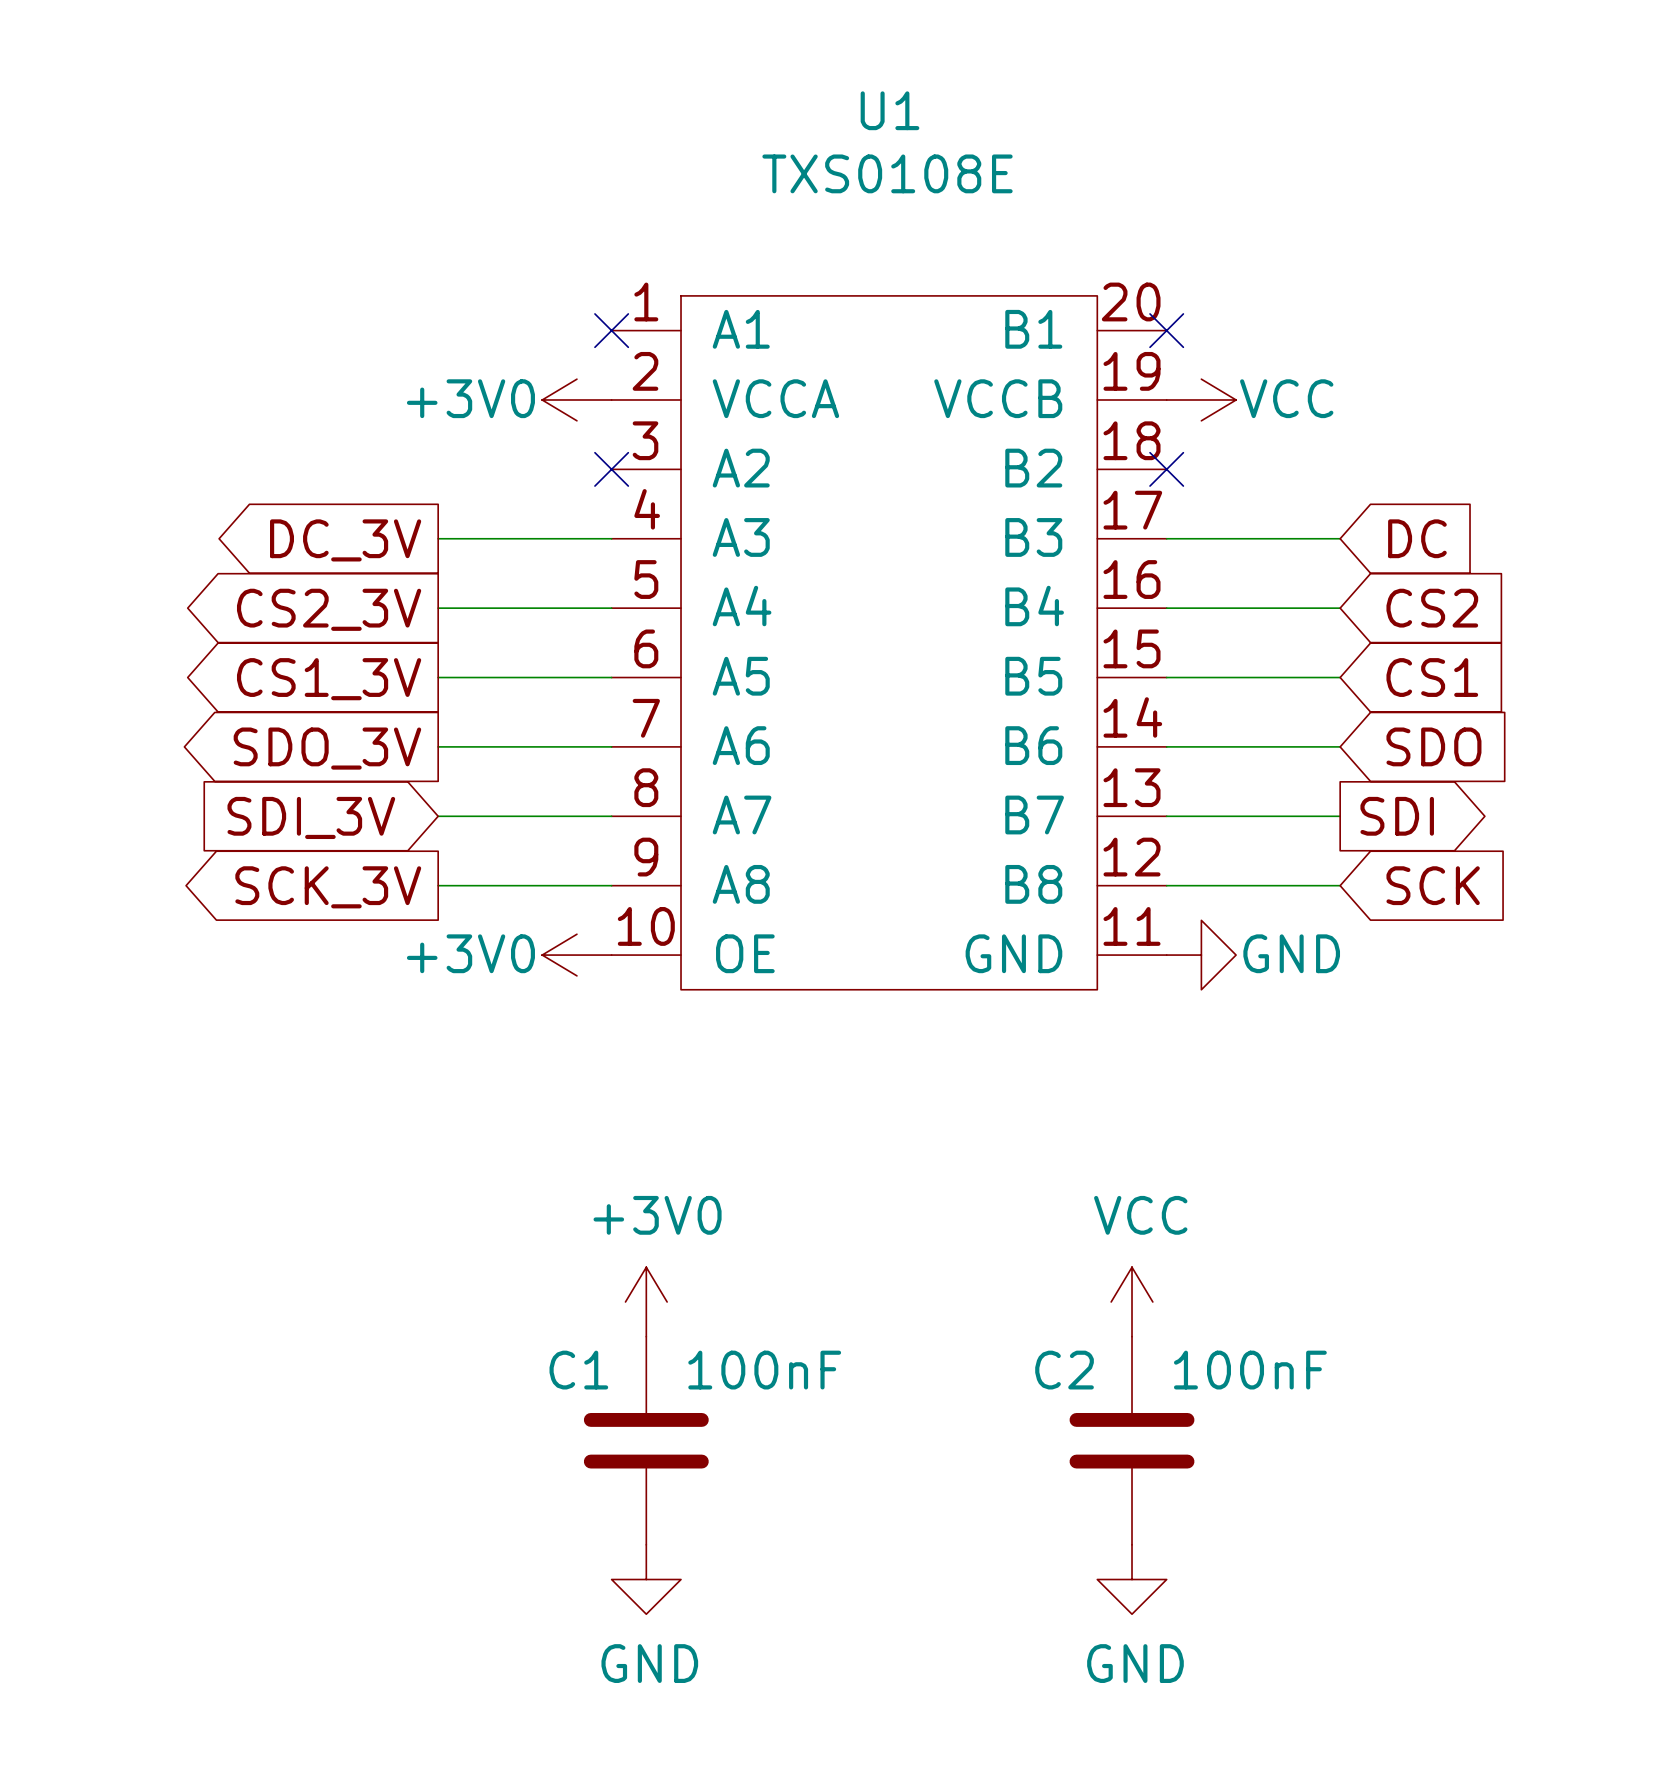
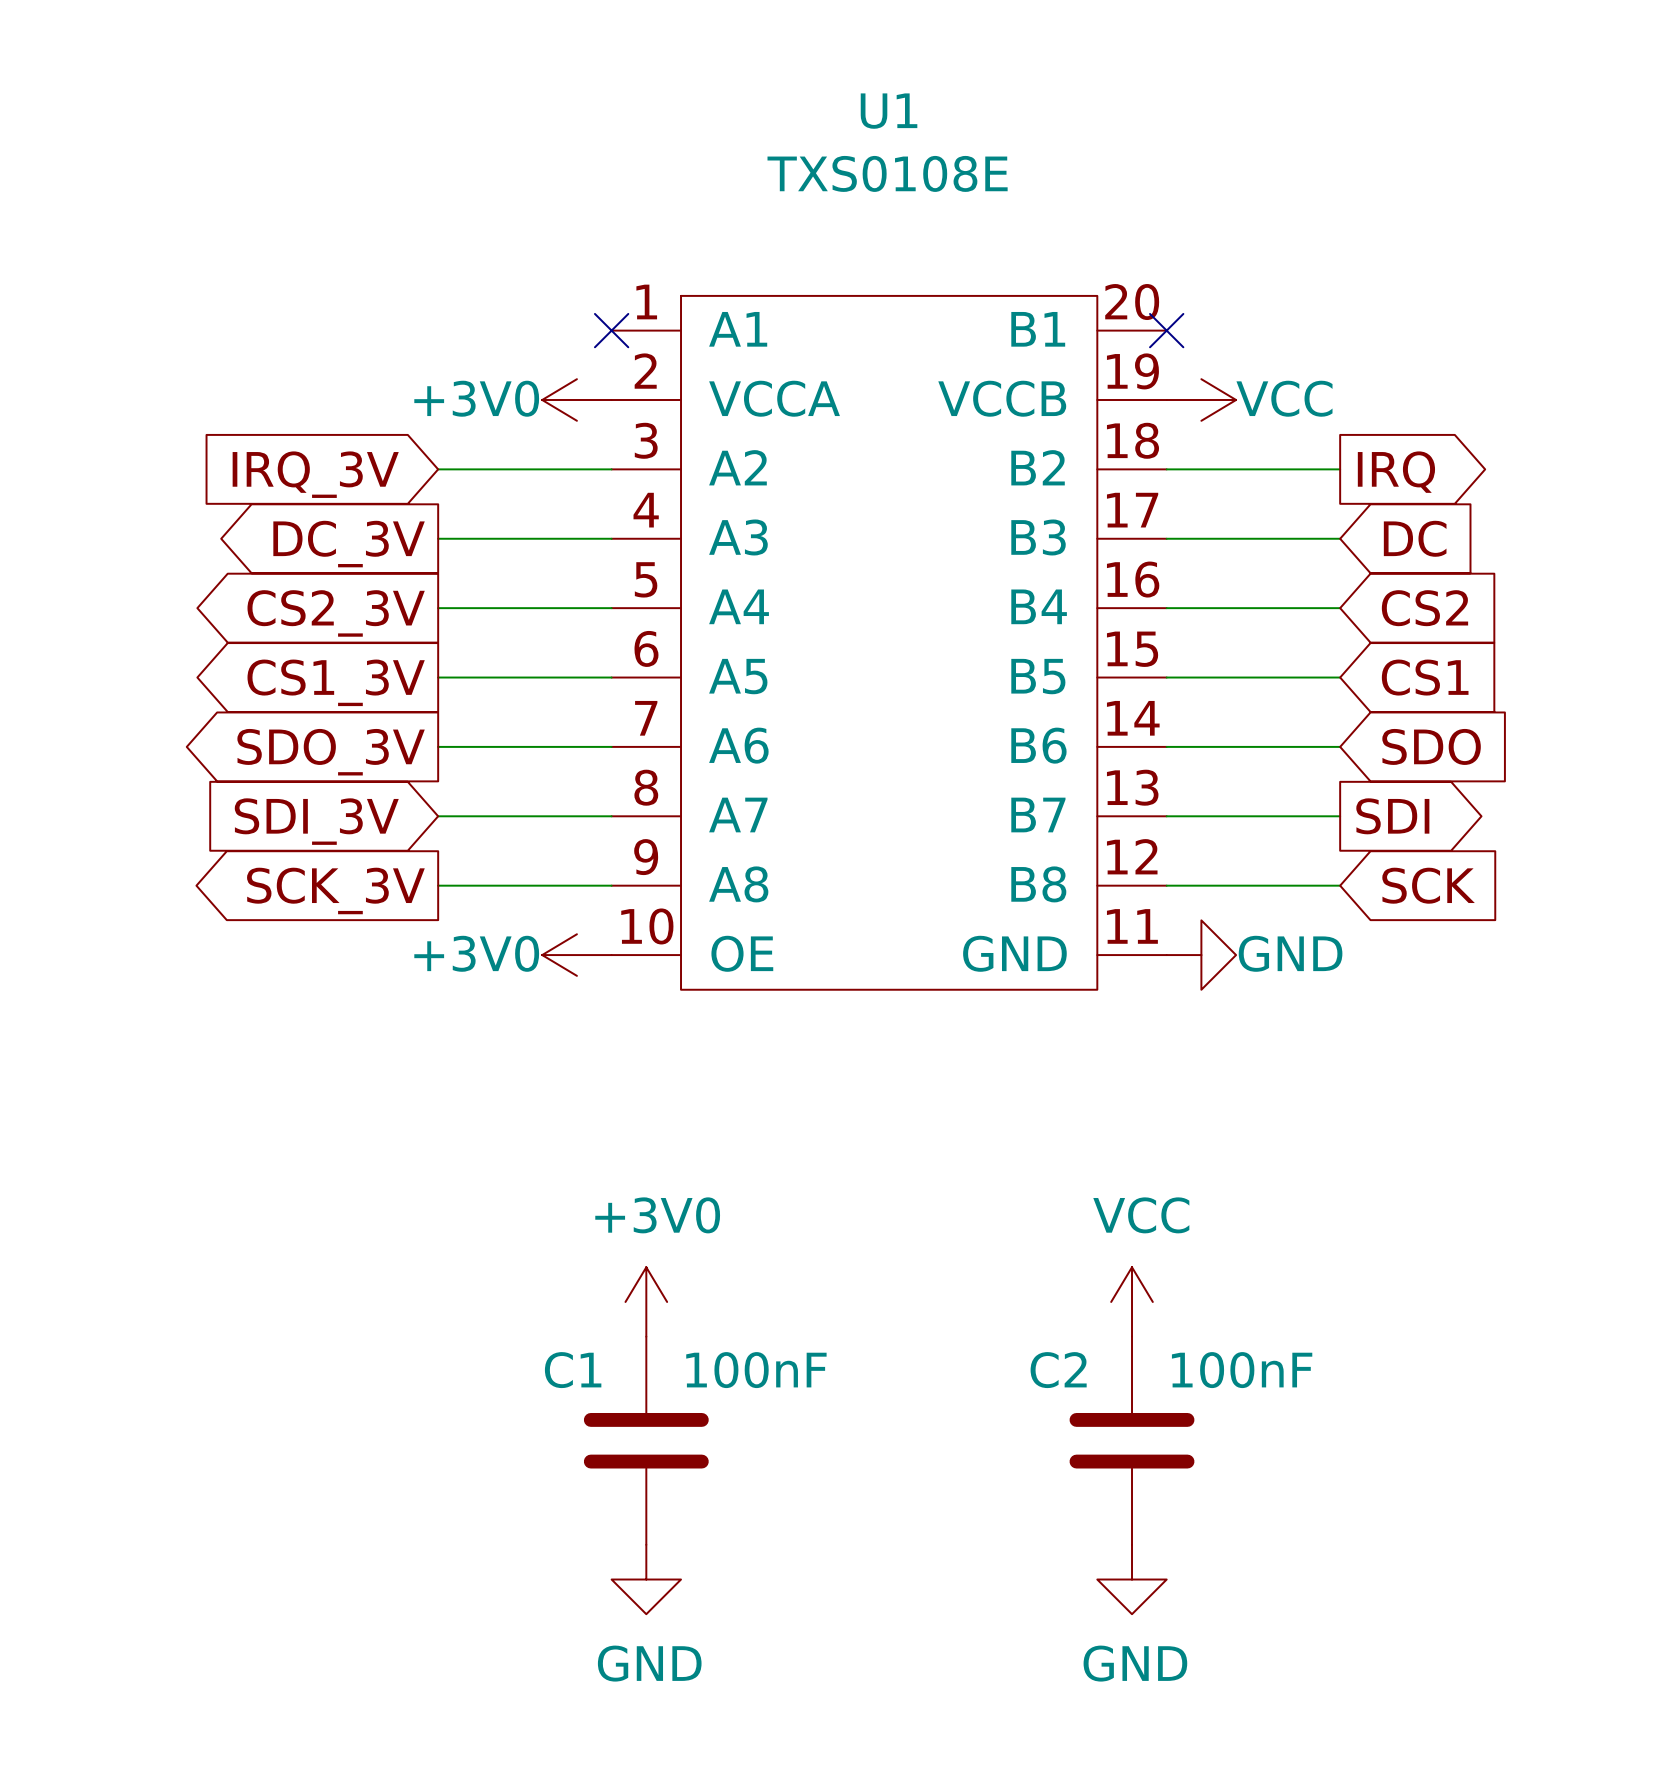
wire: none -> (438, 469) (611, 469)
no-connect mark: (611, 469) -> none
wire: none -> (1166, 469) (1340, 469)
no-connect mark: (1166, 469) -> none
global label: none -> IRQ_3V (315, 474)
global label: none -> IRQ (1396, 472)

